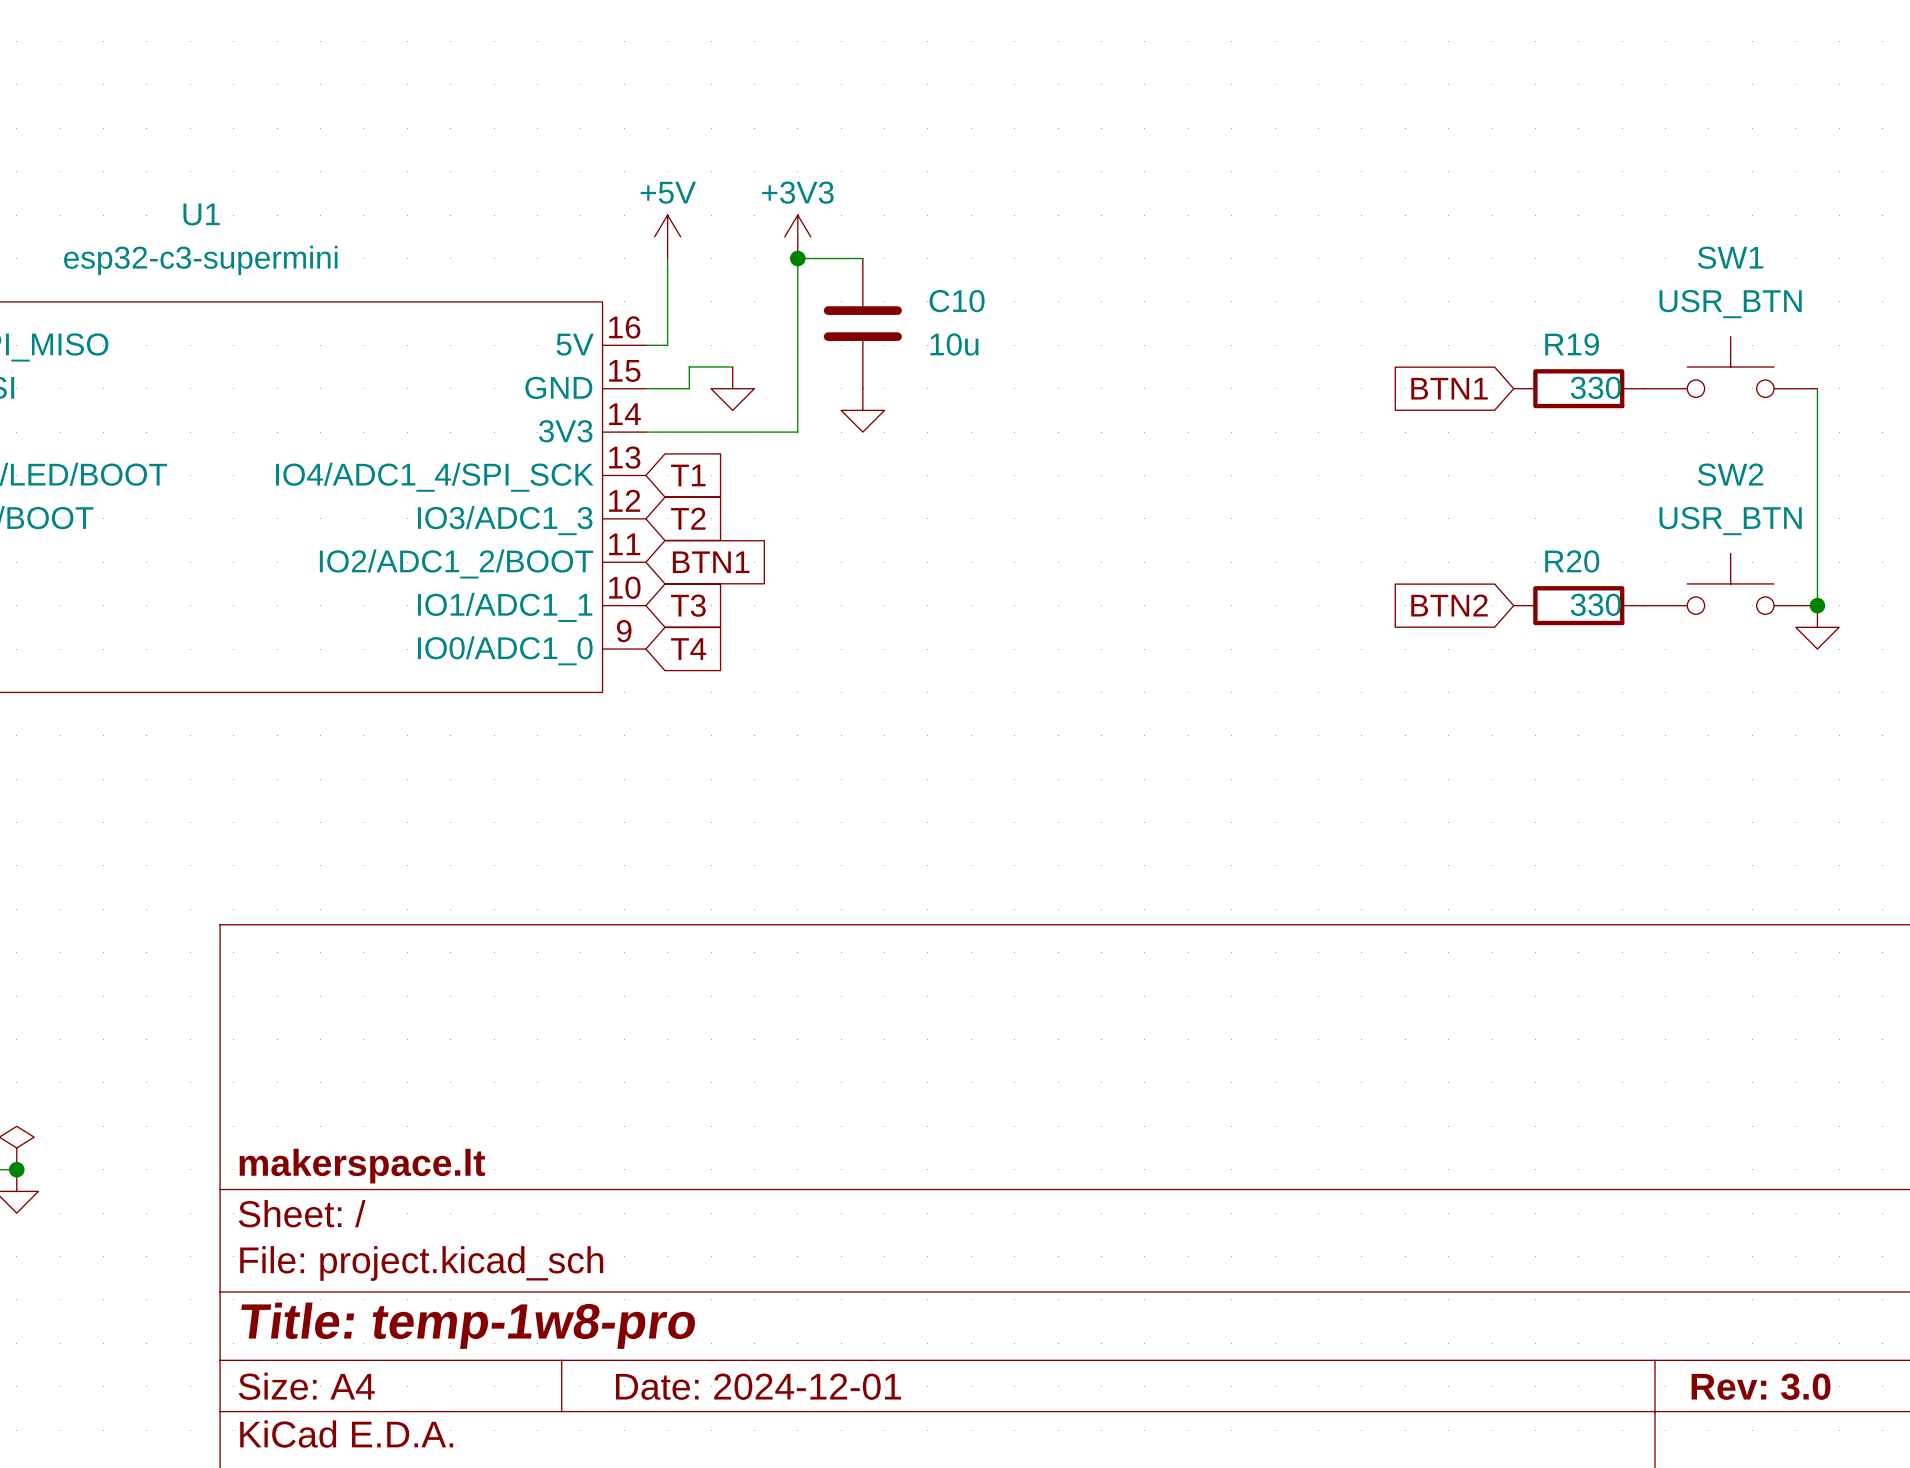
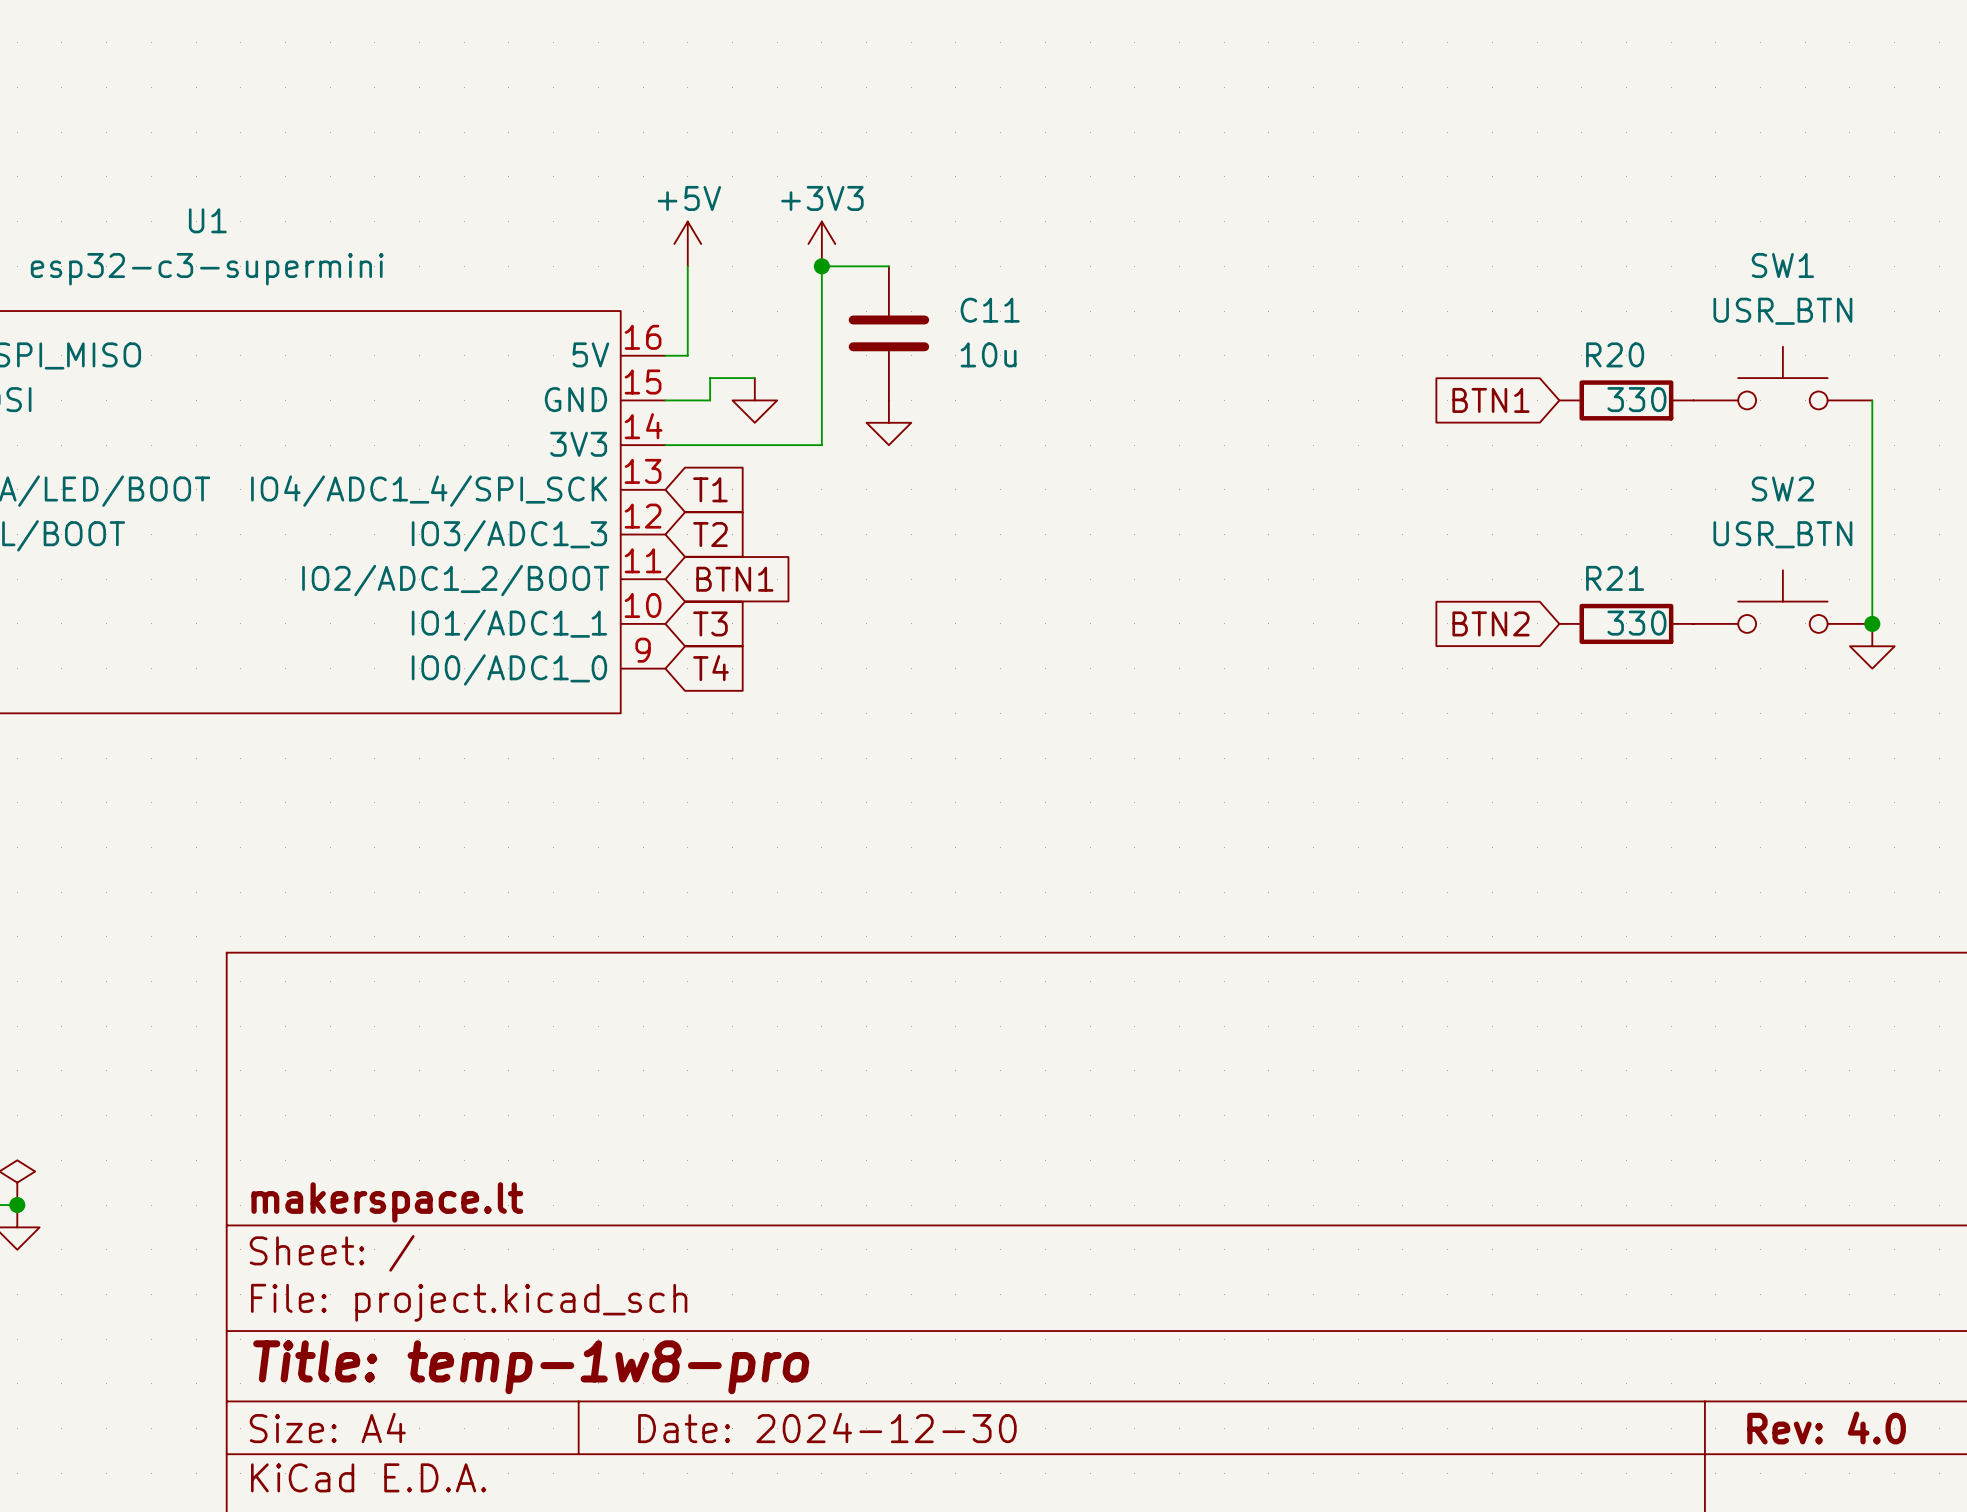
C10 name: C10 (957, 301) -> C11 (990, 310)
R19 name: R19 (1572, 344) -> R20 (1615, 354)
R20 name: R20 (1572, 561) -> R21 (1615, 578)
title block: Date: 2024-12-01 (758, 1386) -> Date: 2024-12-30 (827, 1427)
title block: Rev: 3.0 (1761, 1386) -> Rev: 4.0 (1826, 1427)

